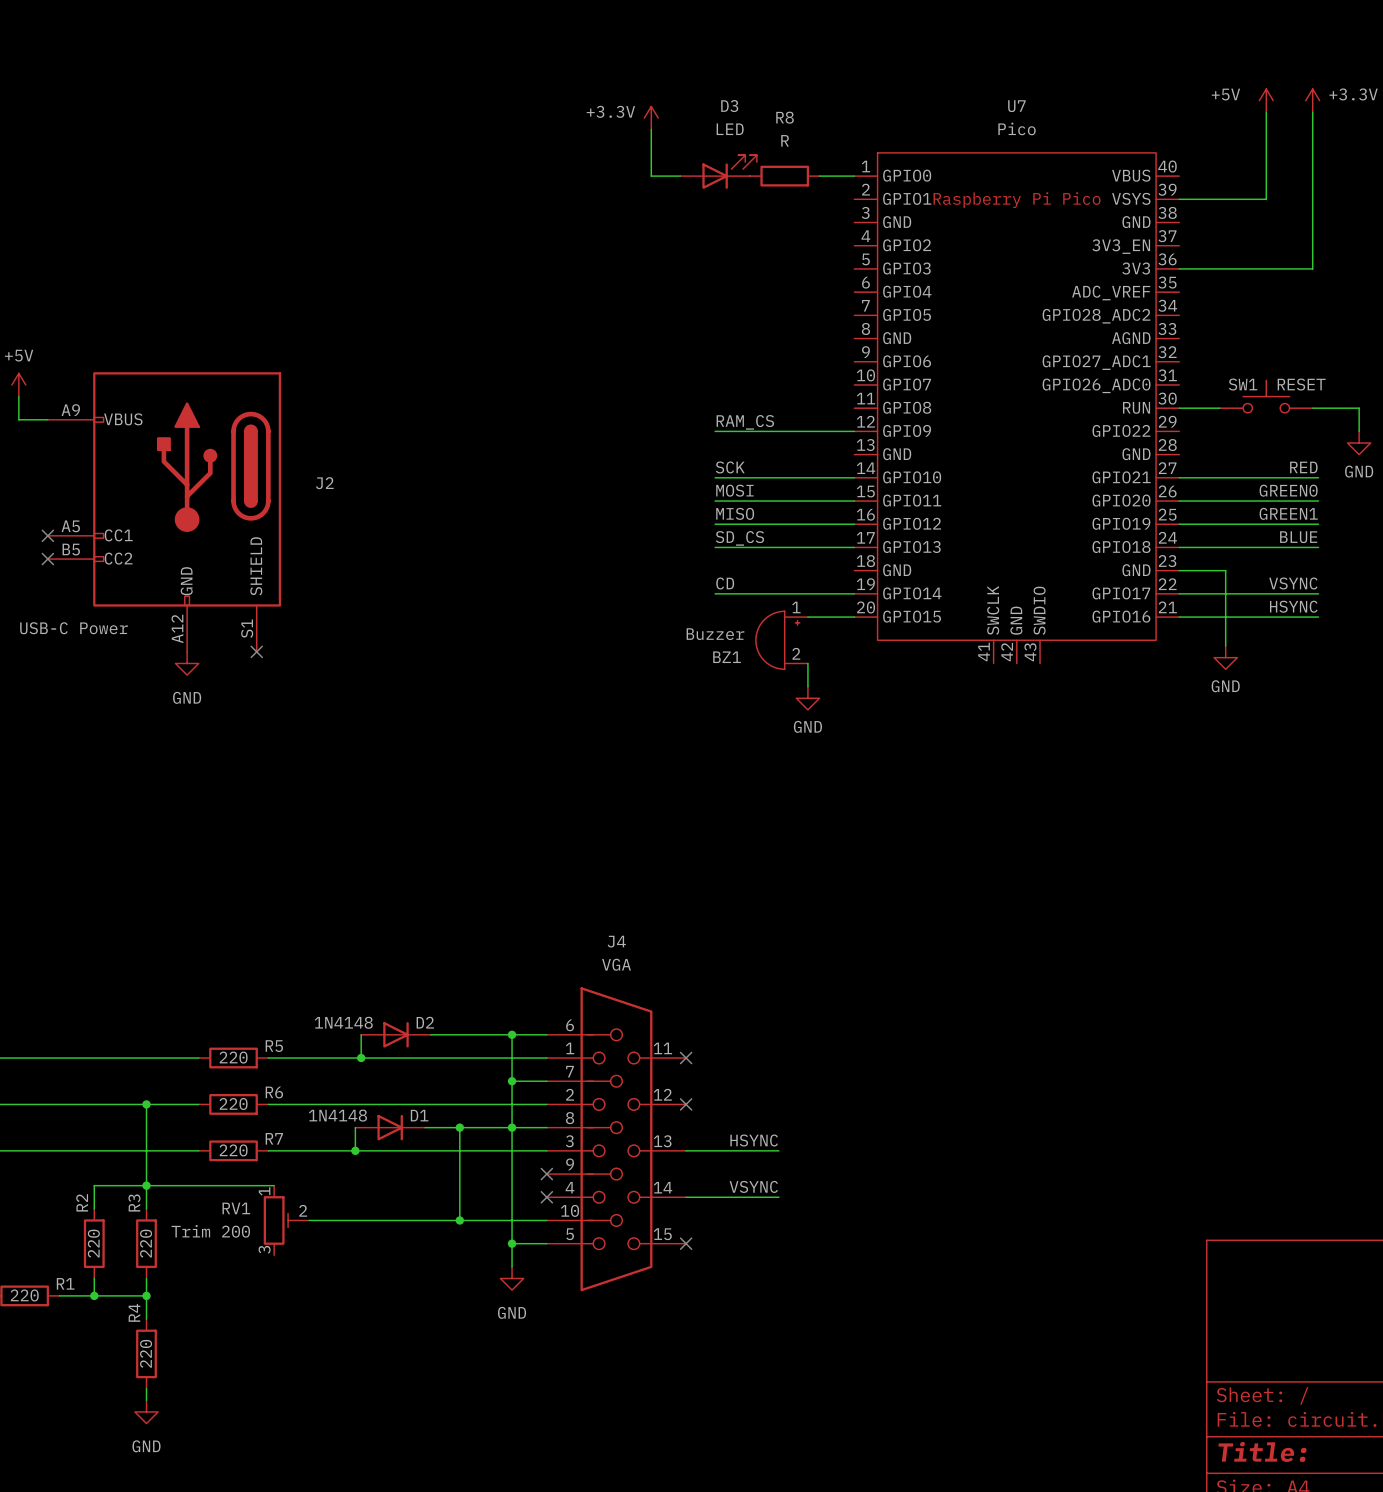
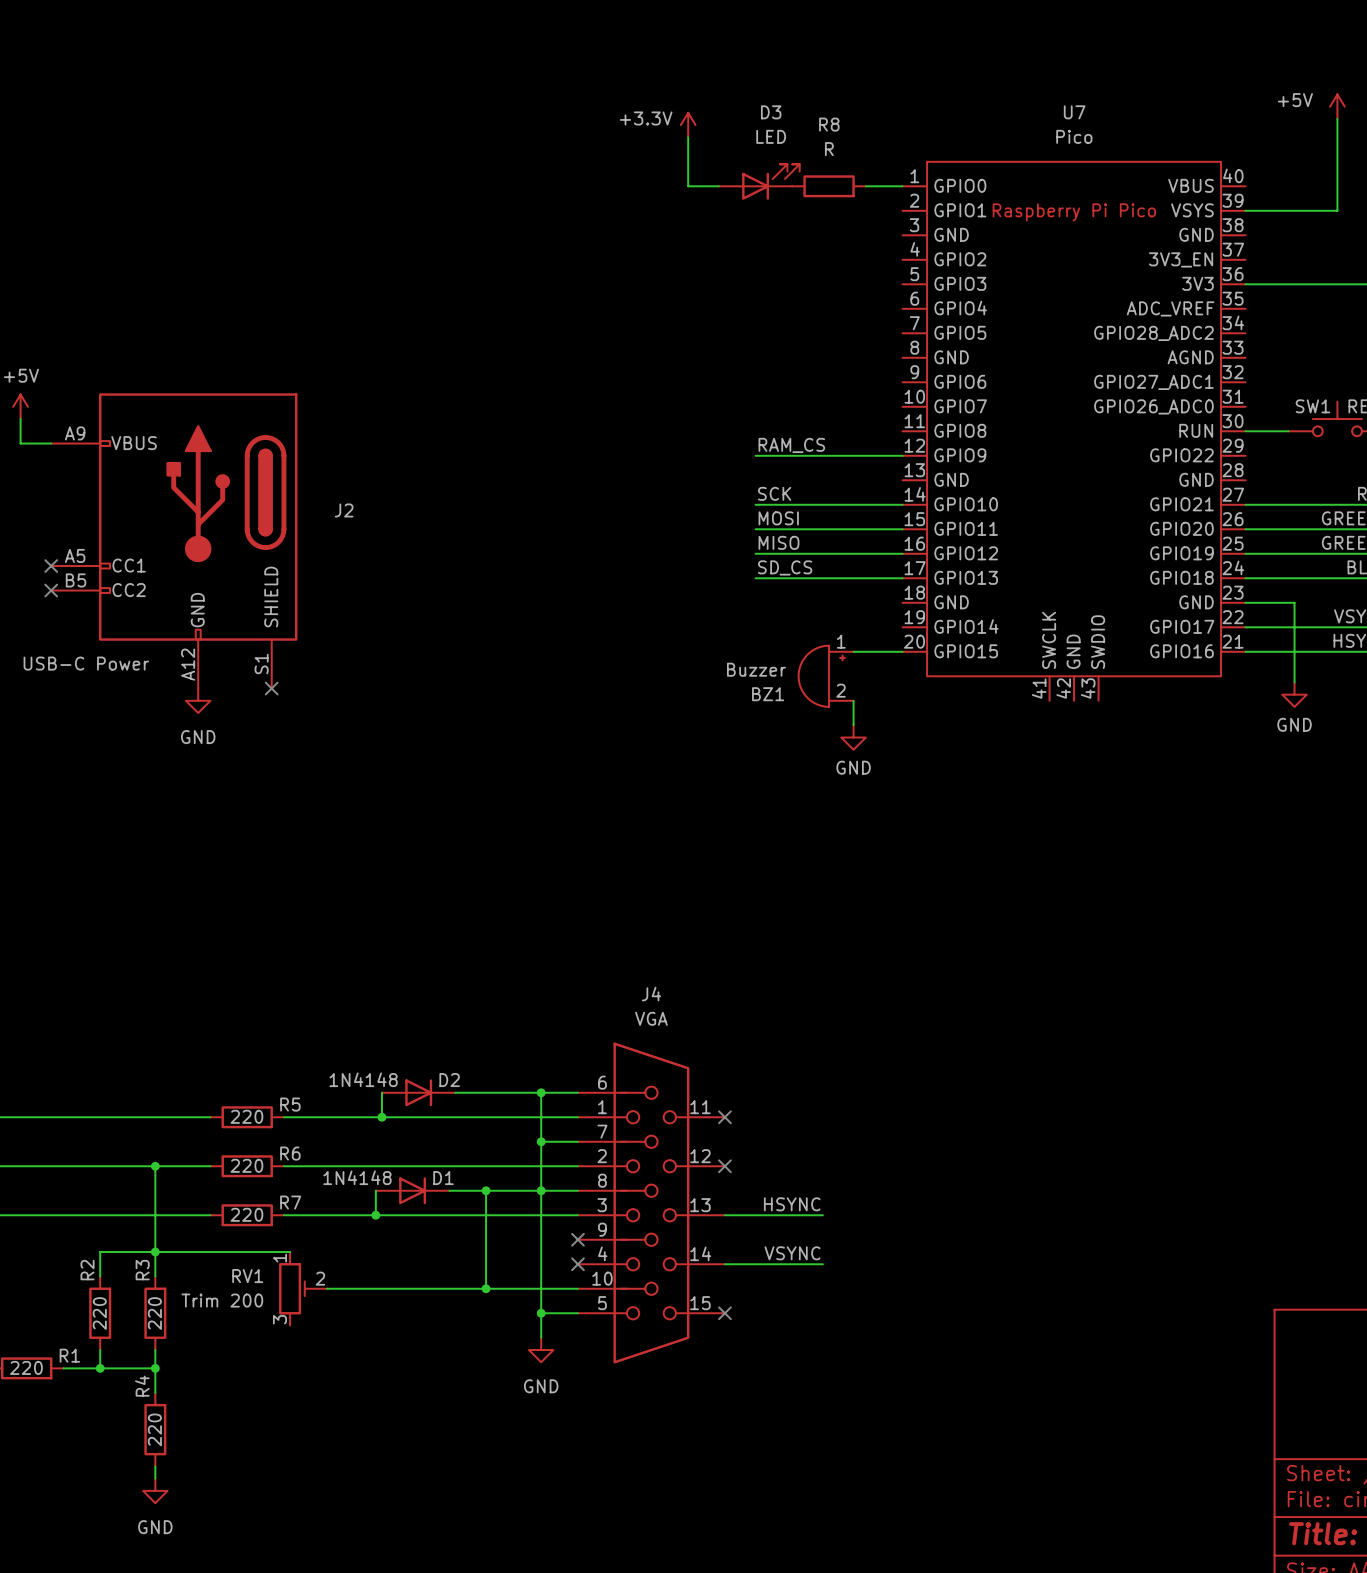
label: CD (725, 583) -> none
wire: (715, 593) (854, 593) -> none

